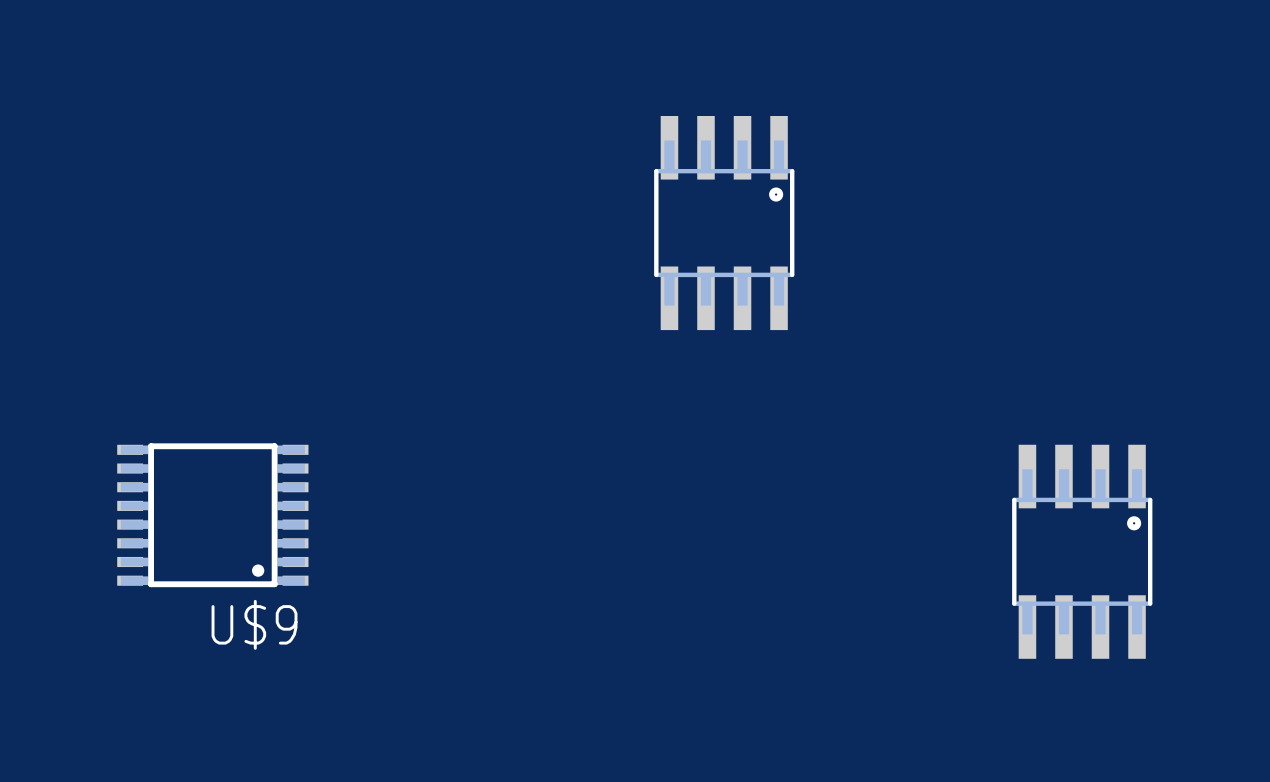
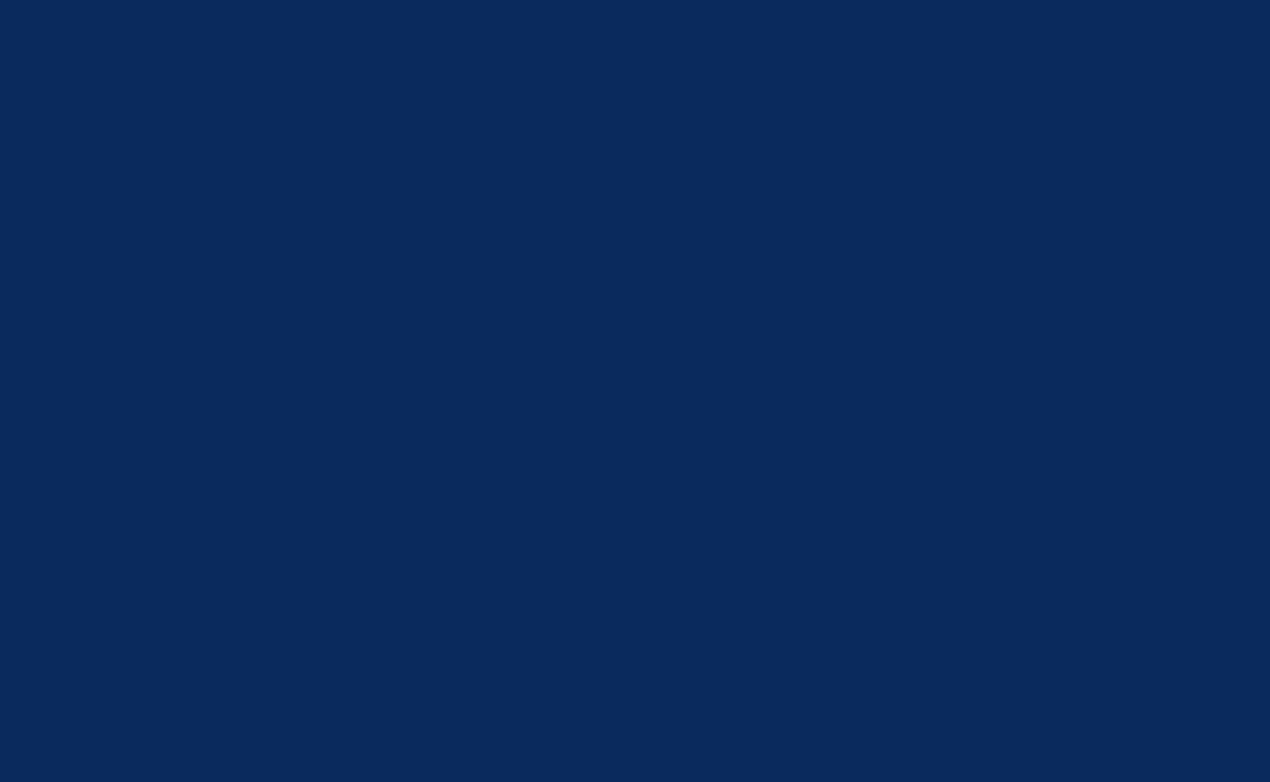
part: (724, 223) -> none
U$9: (212, 515) -> none
part: (1082, 551) -> none

